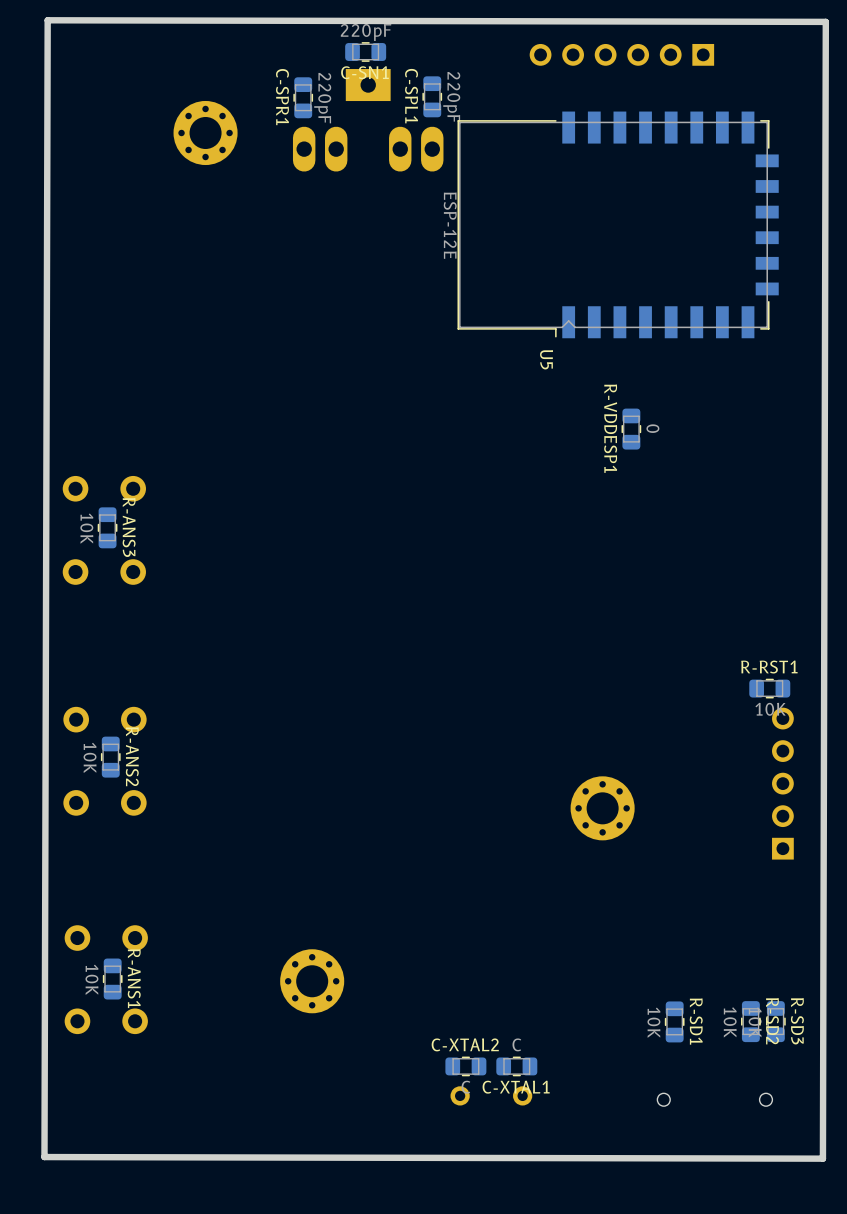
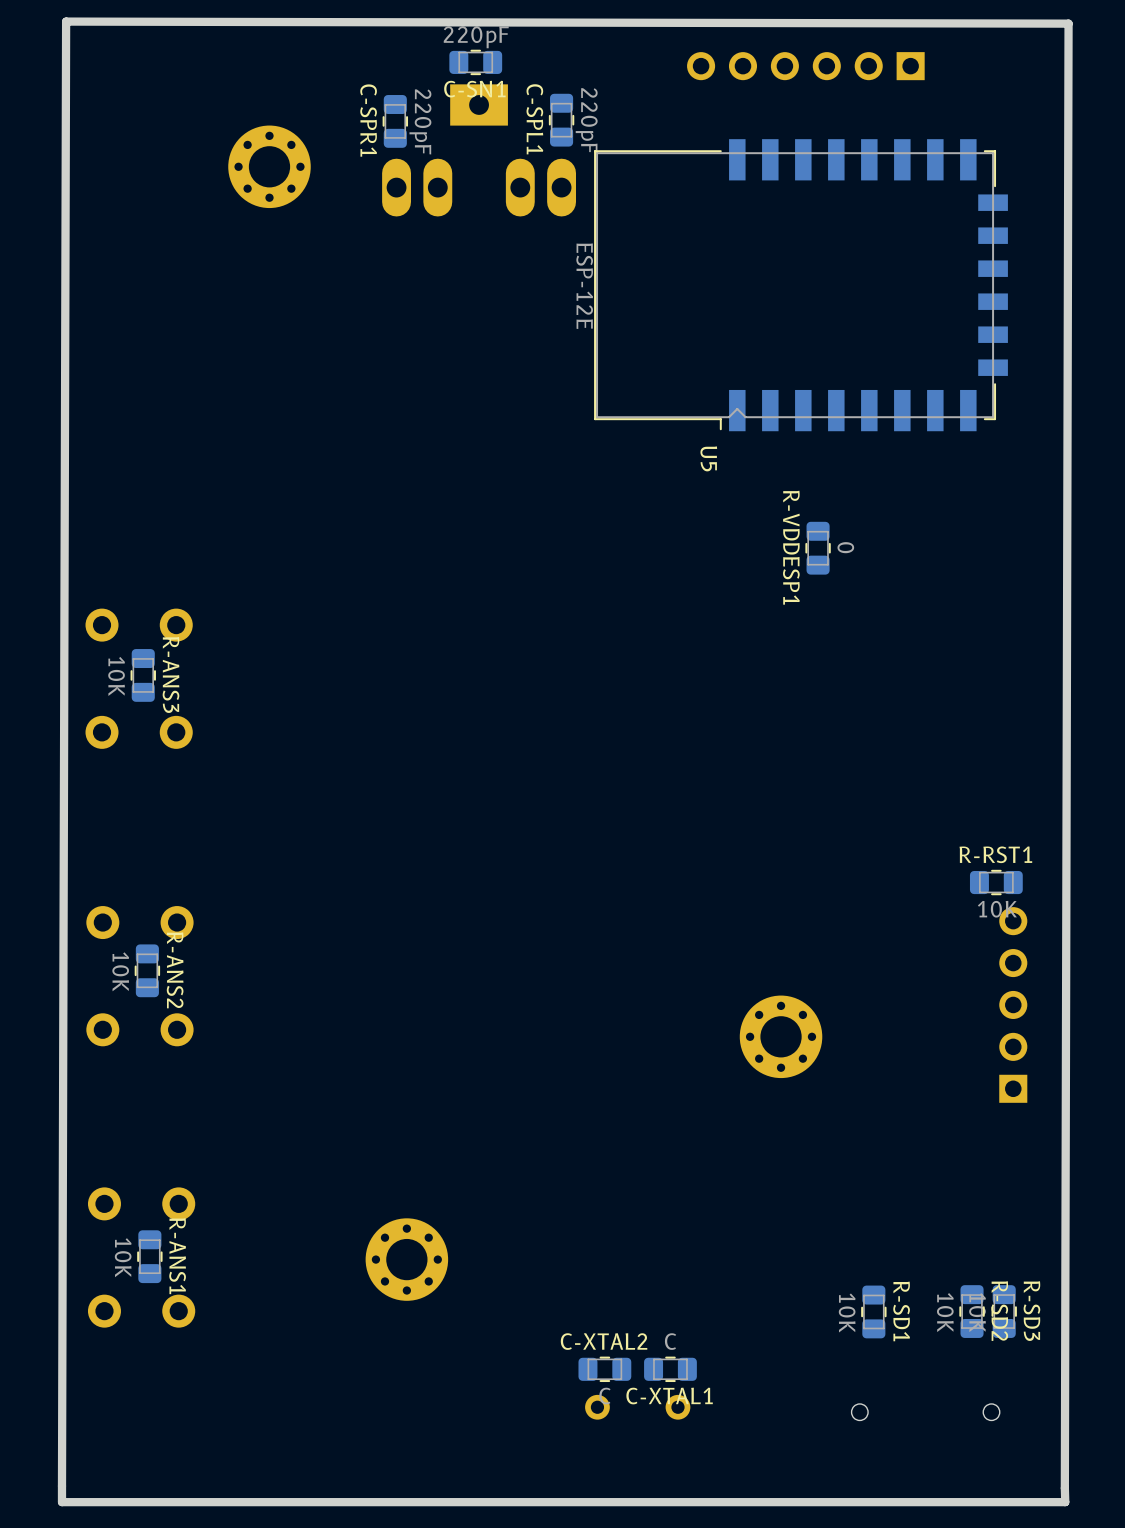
board edge: (44, 1157) (822, 1158) -> (61, 1486) (61, 1502) (1065, 1502) (1064, 1488)

